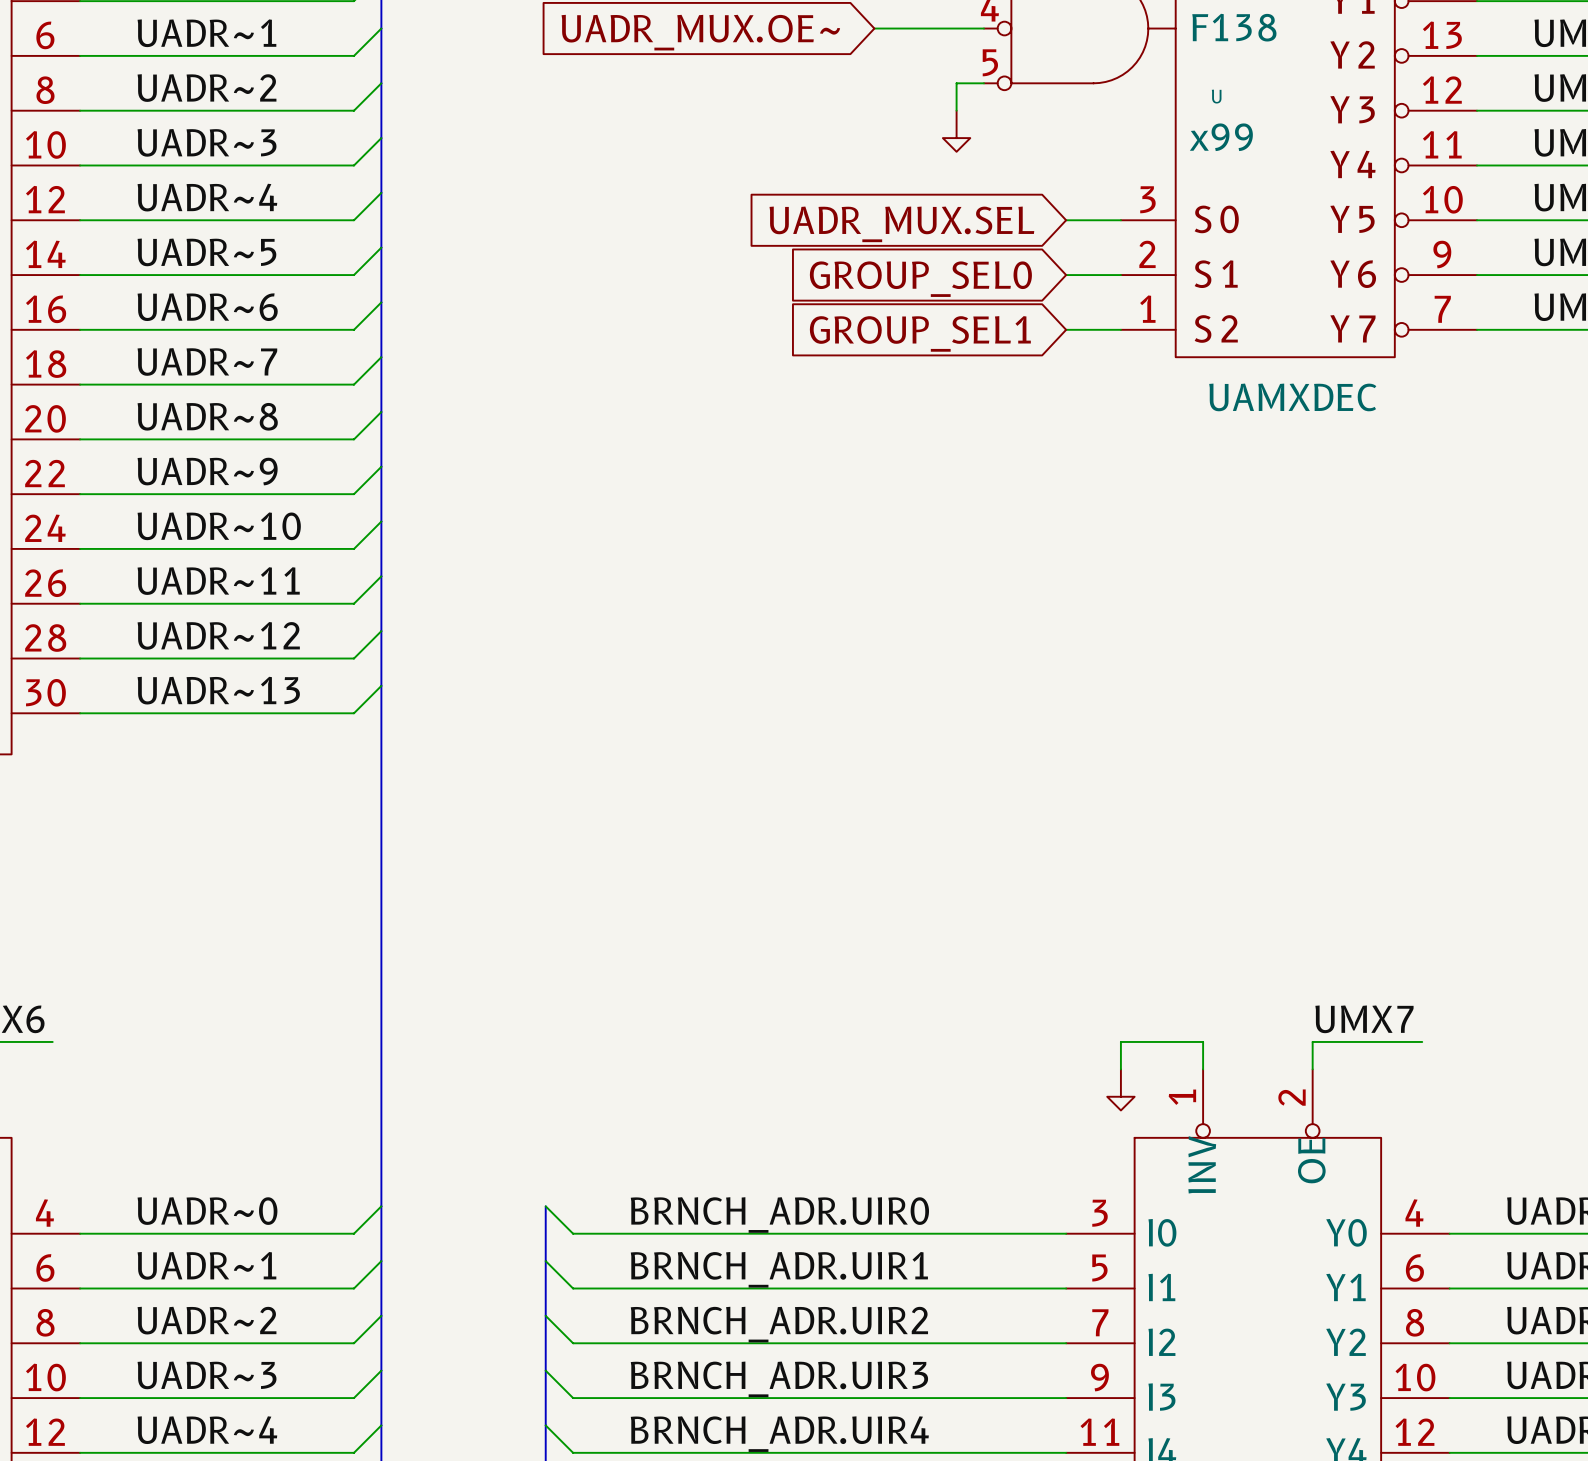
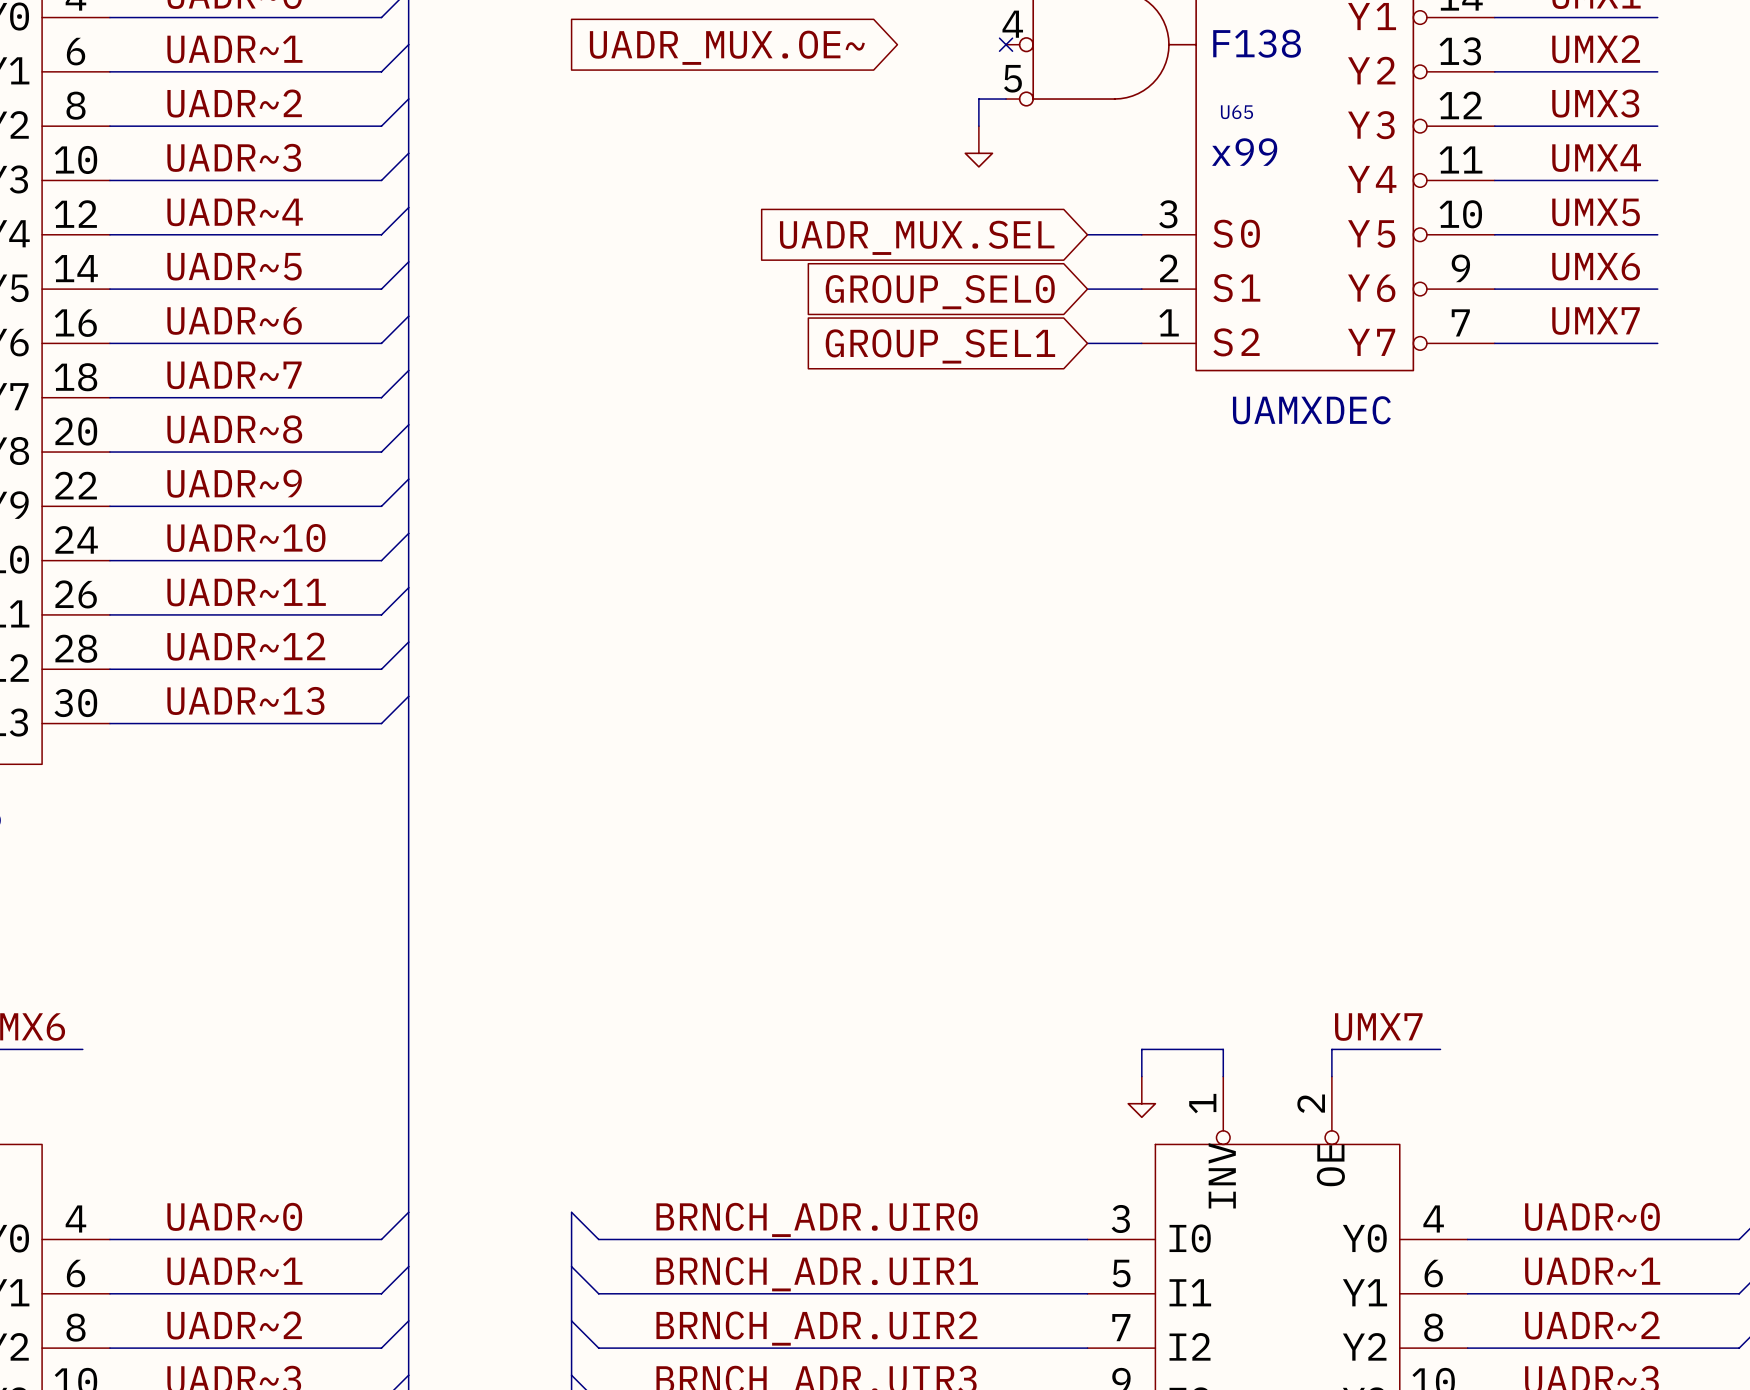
wire: (874, 28) (983, 28) -> none
no-connect mark: none -> (1006, 44)
U name: U (1216, 96) -> U65 (1236, 112)

